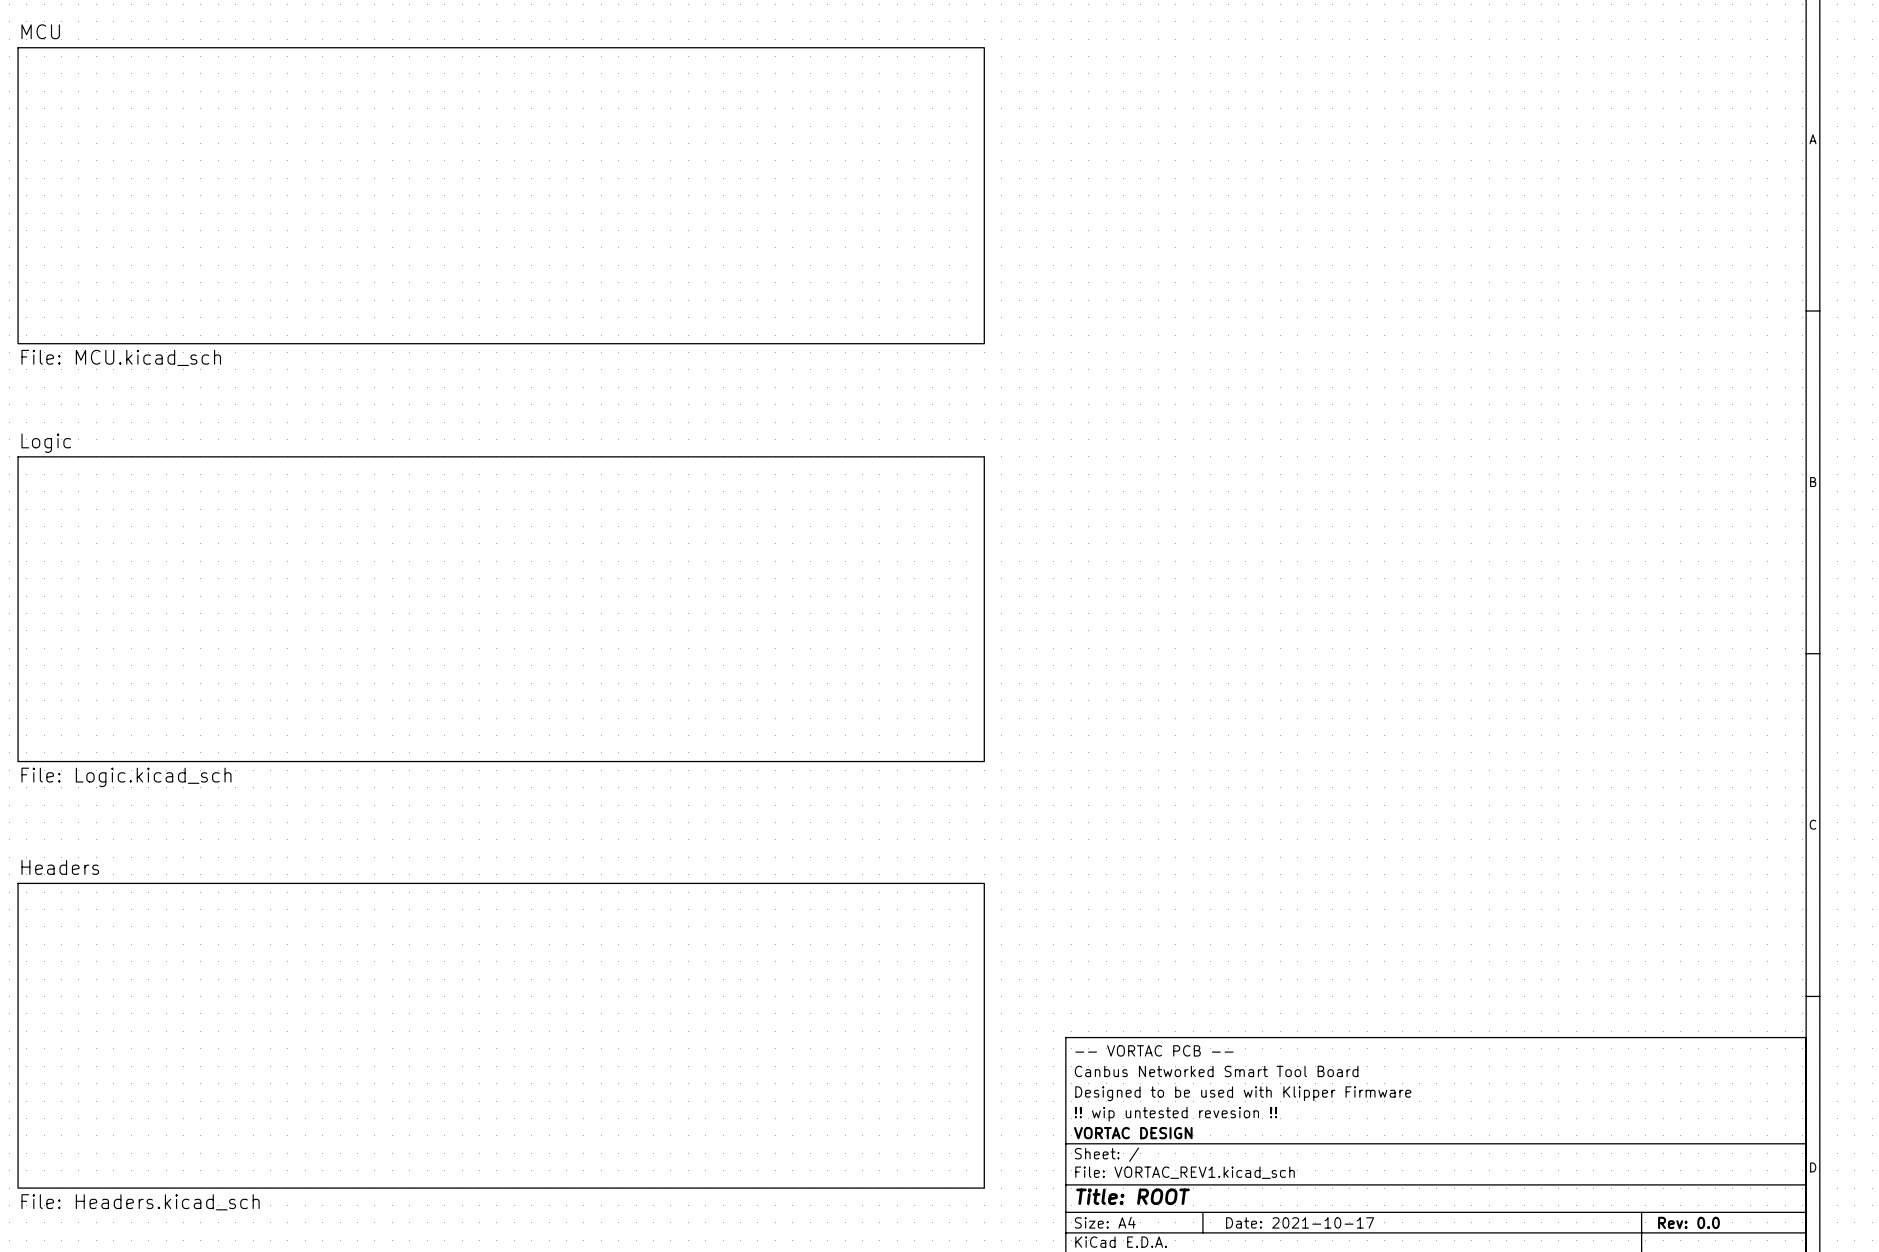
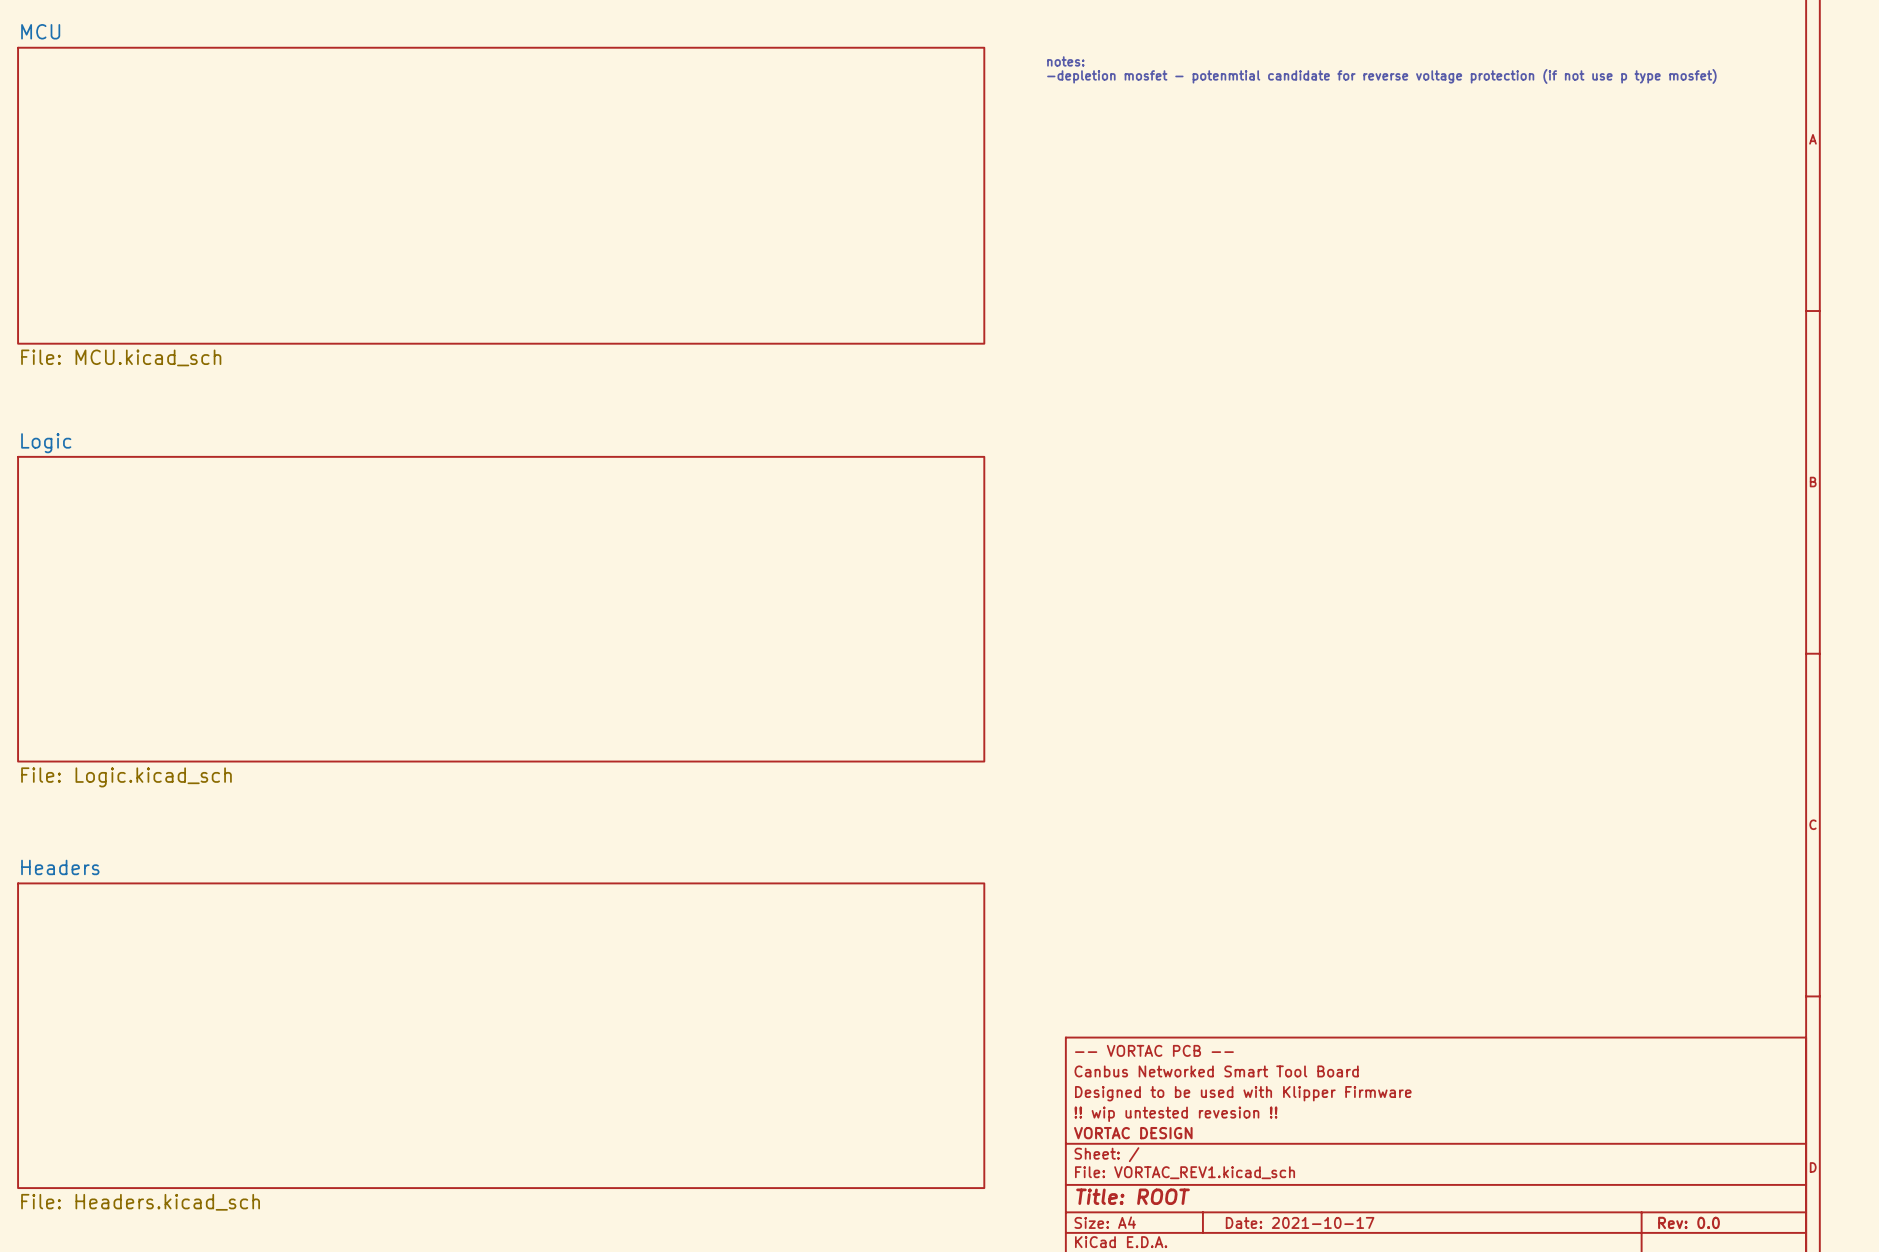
text: none -> notes: (1065, 61)
text: none -> -depletion mosfet - potenmtial candidate for reverse voltage protection (if not use p type mosfet) (1381, 76)

